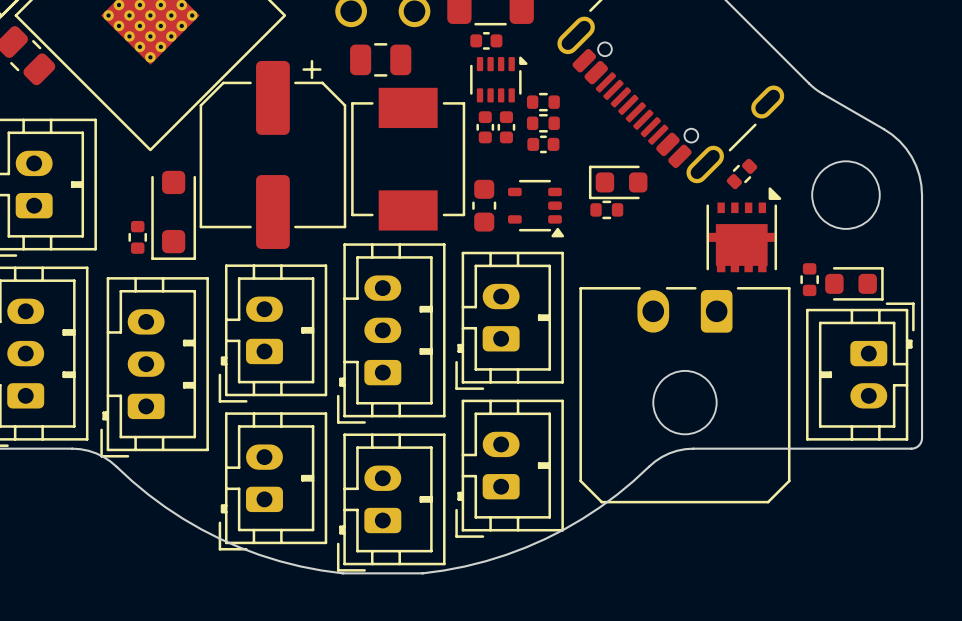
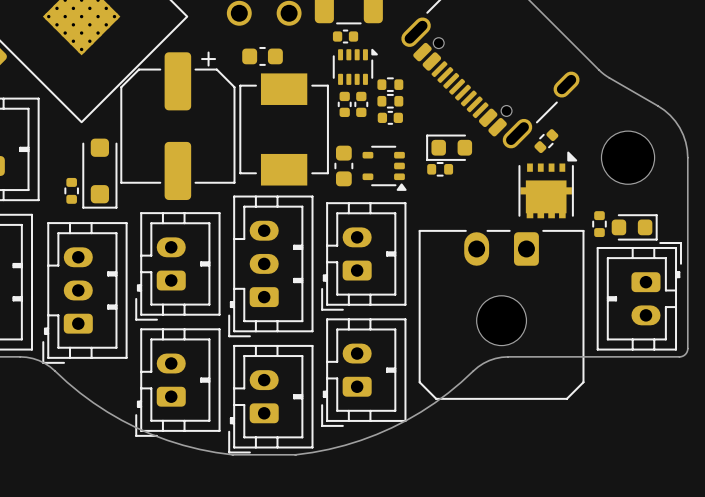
part footprint: [350, 43, 412, 77] -> [242, 46, 283, 66]

